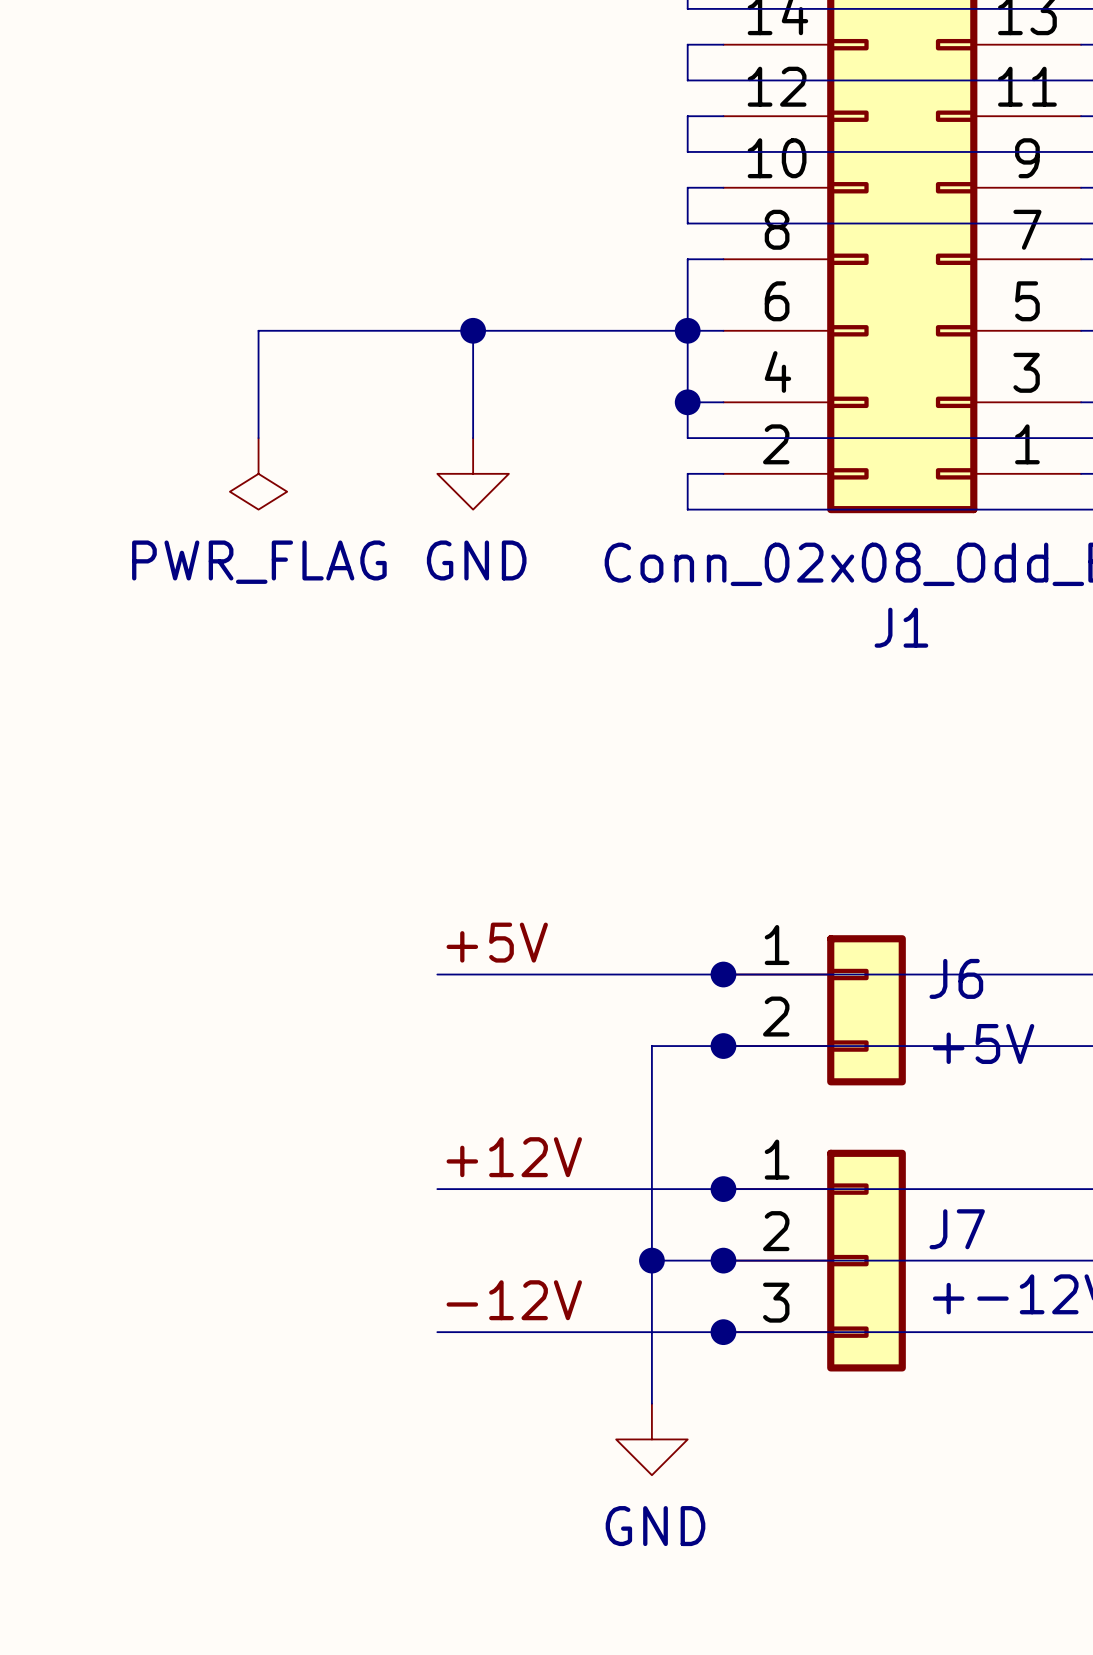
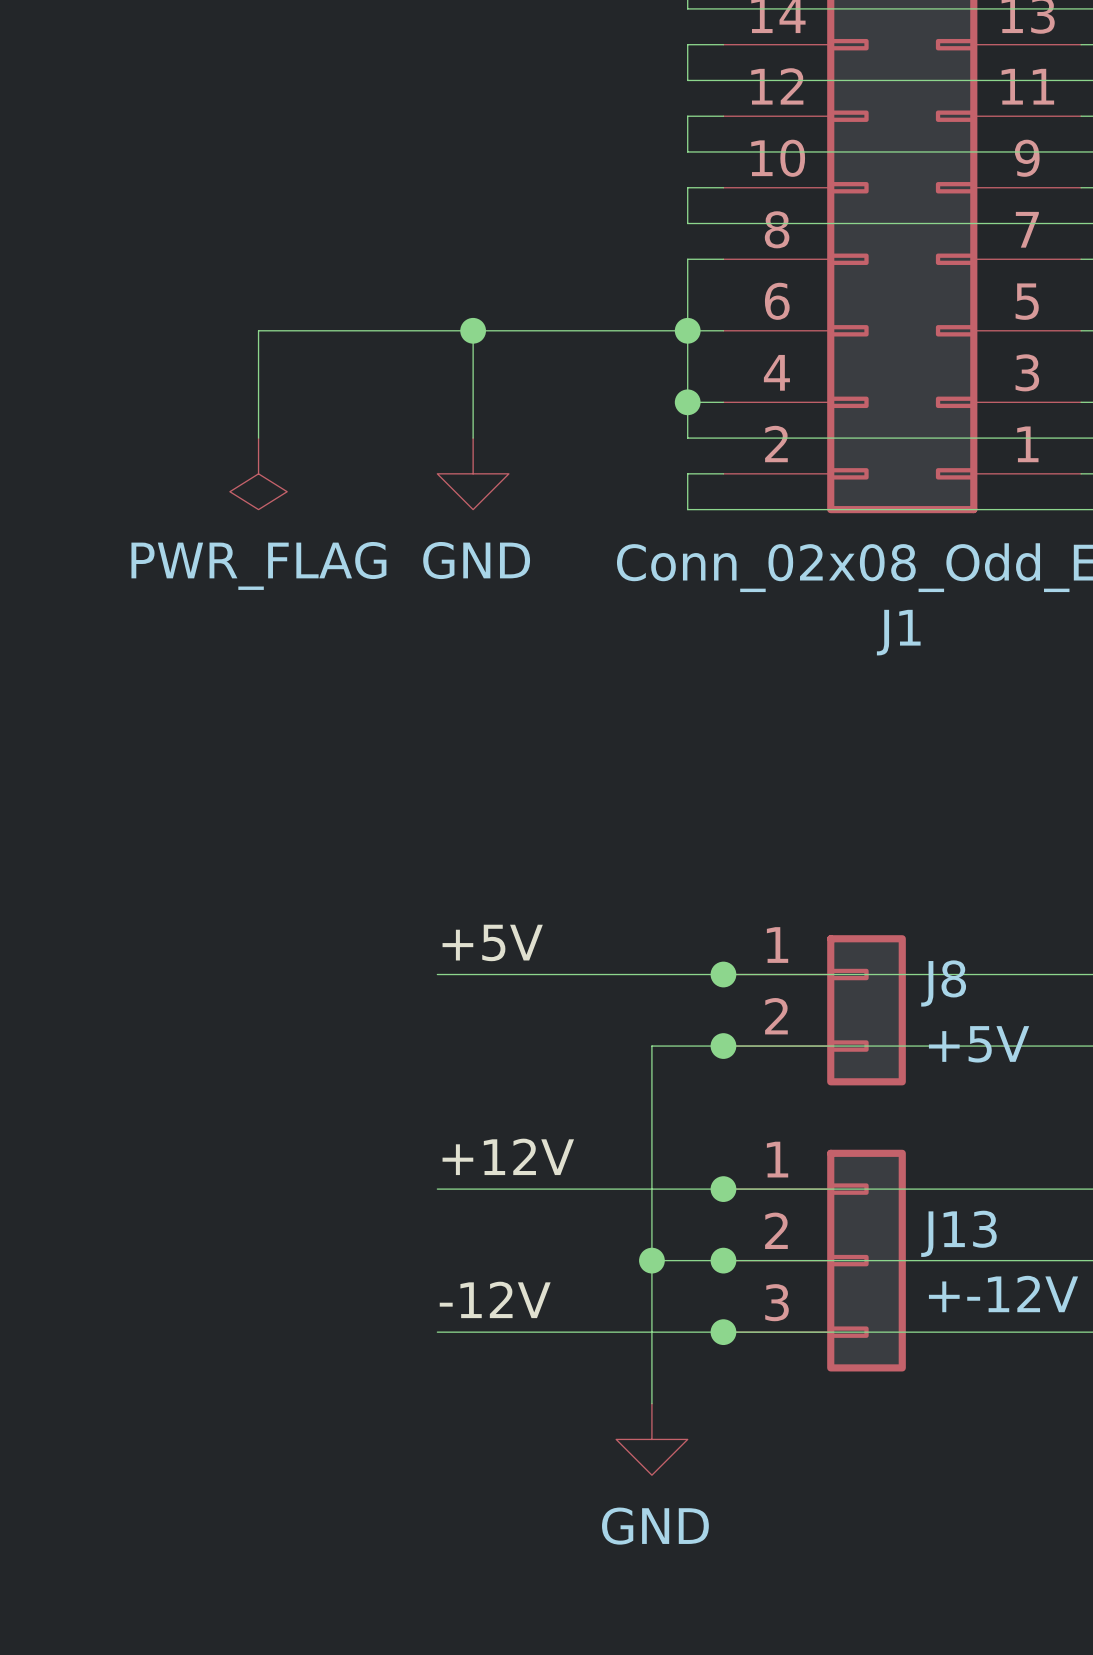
J6 name: J6 (956, 978) -> J8 (943, 983)
J7 name: J7 (957, 1229) -> J13 (958, 1233)

